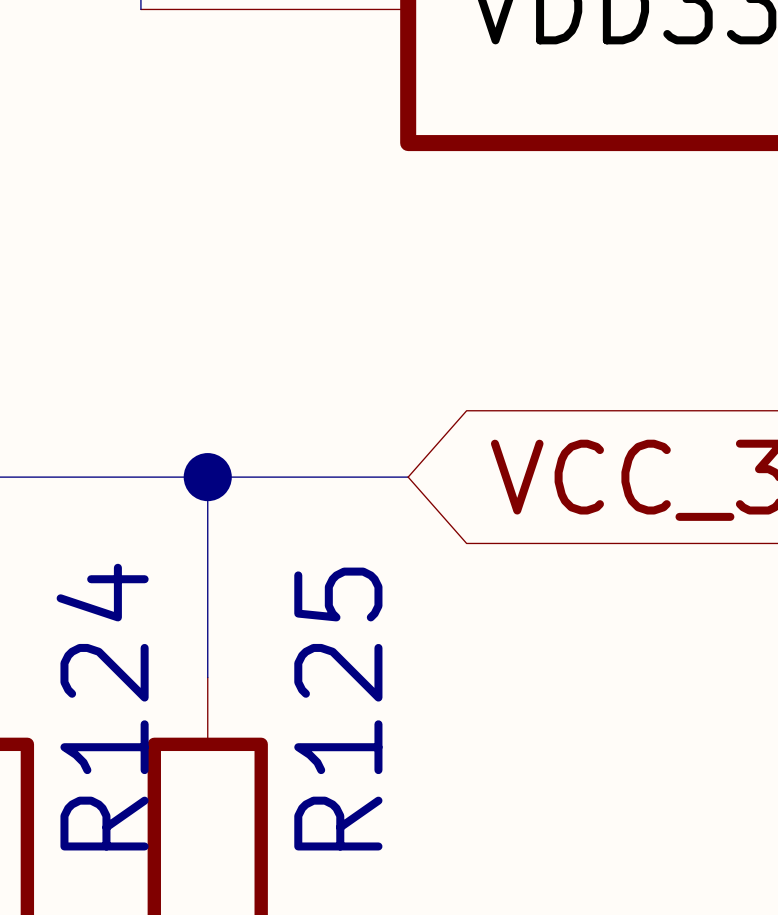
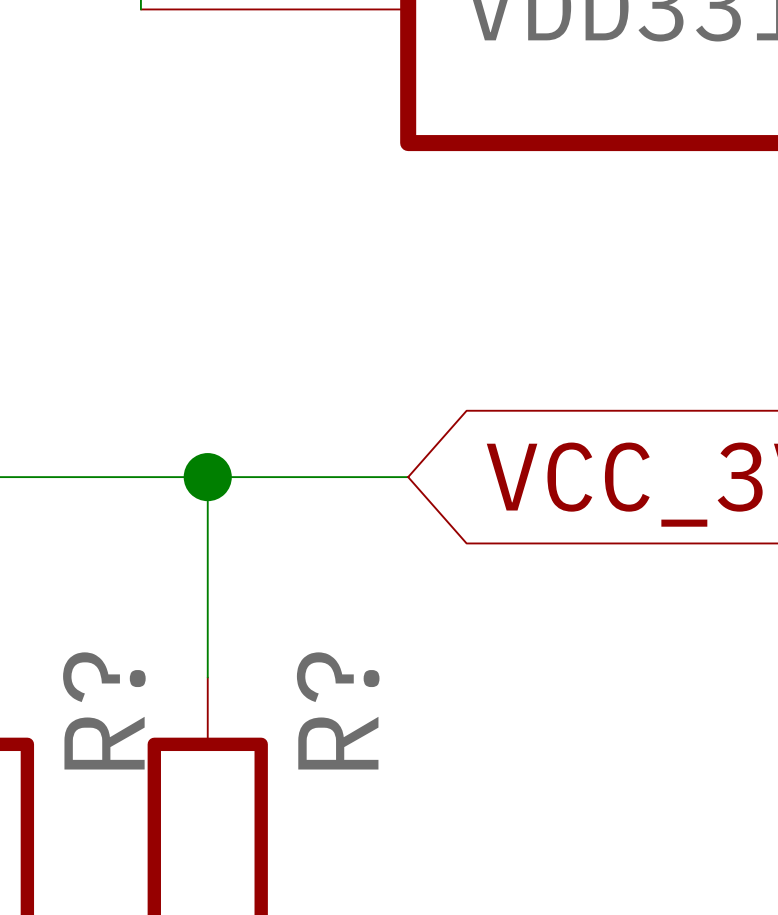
R124 name: R124 (102, 707) -> R? (104, 710)
R125 name: R125 (338, 709) -> R? (338, 710)

